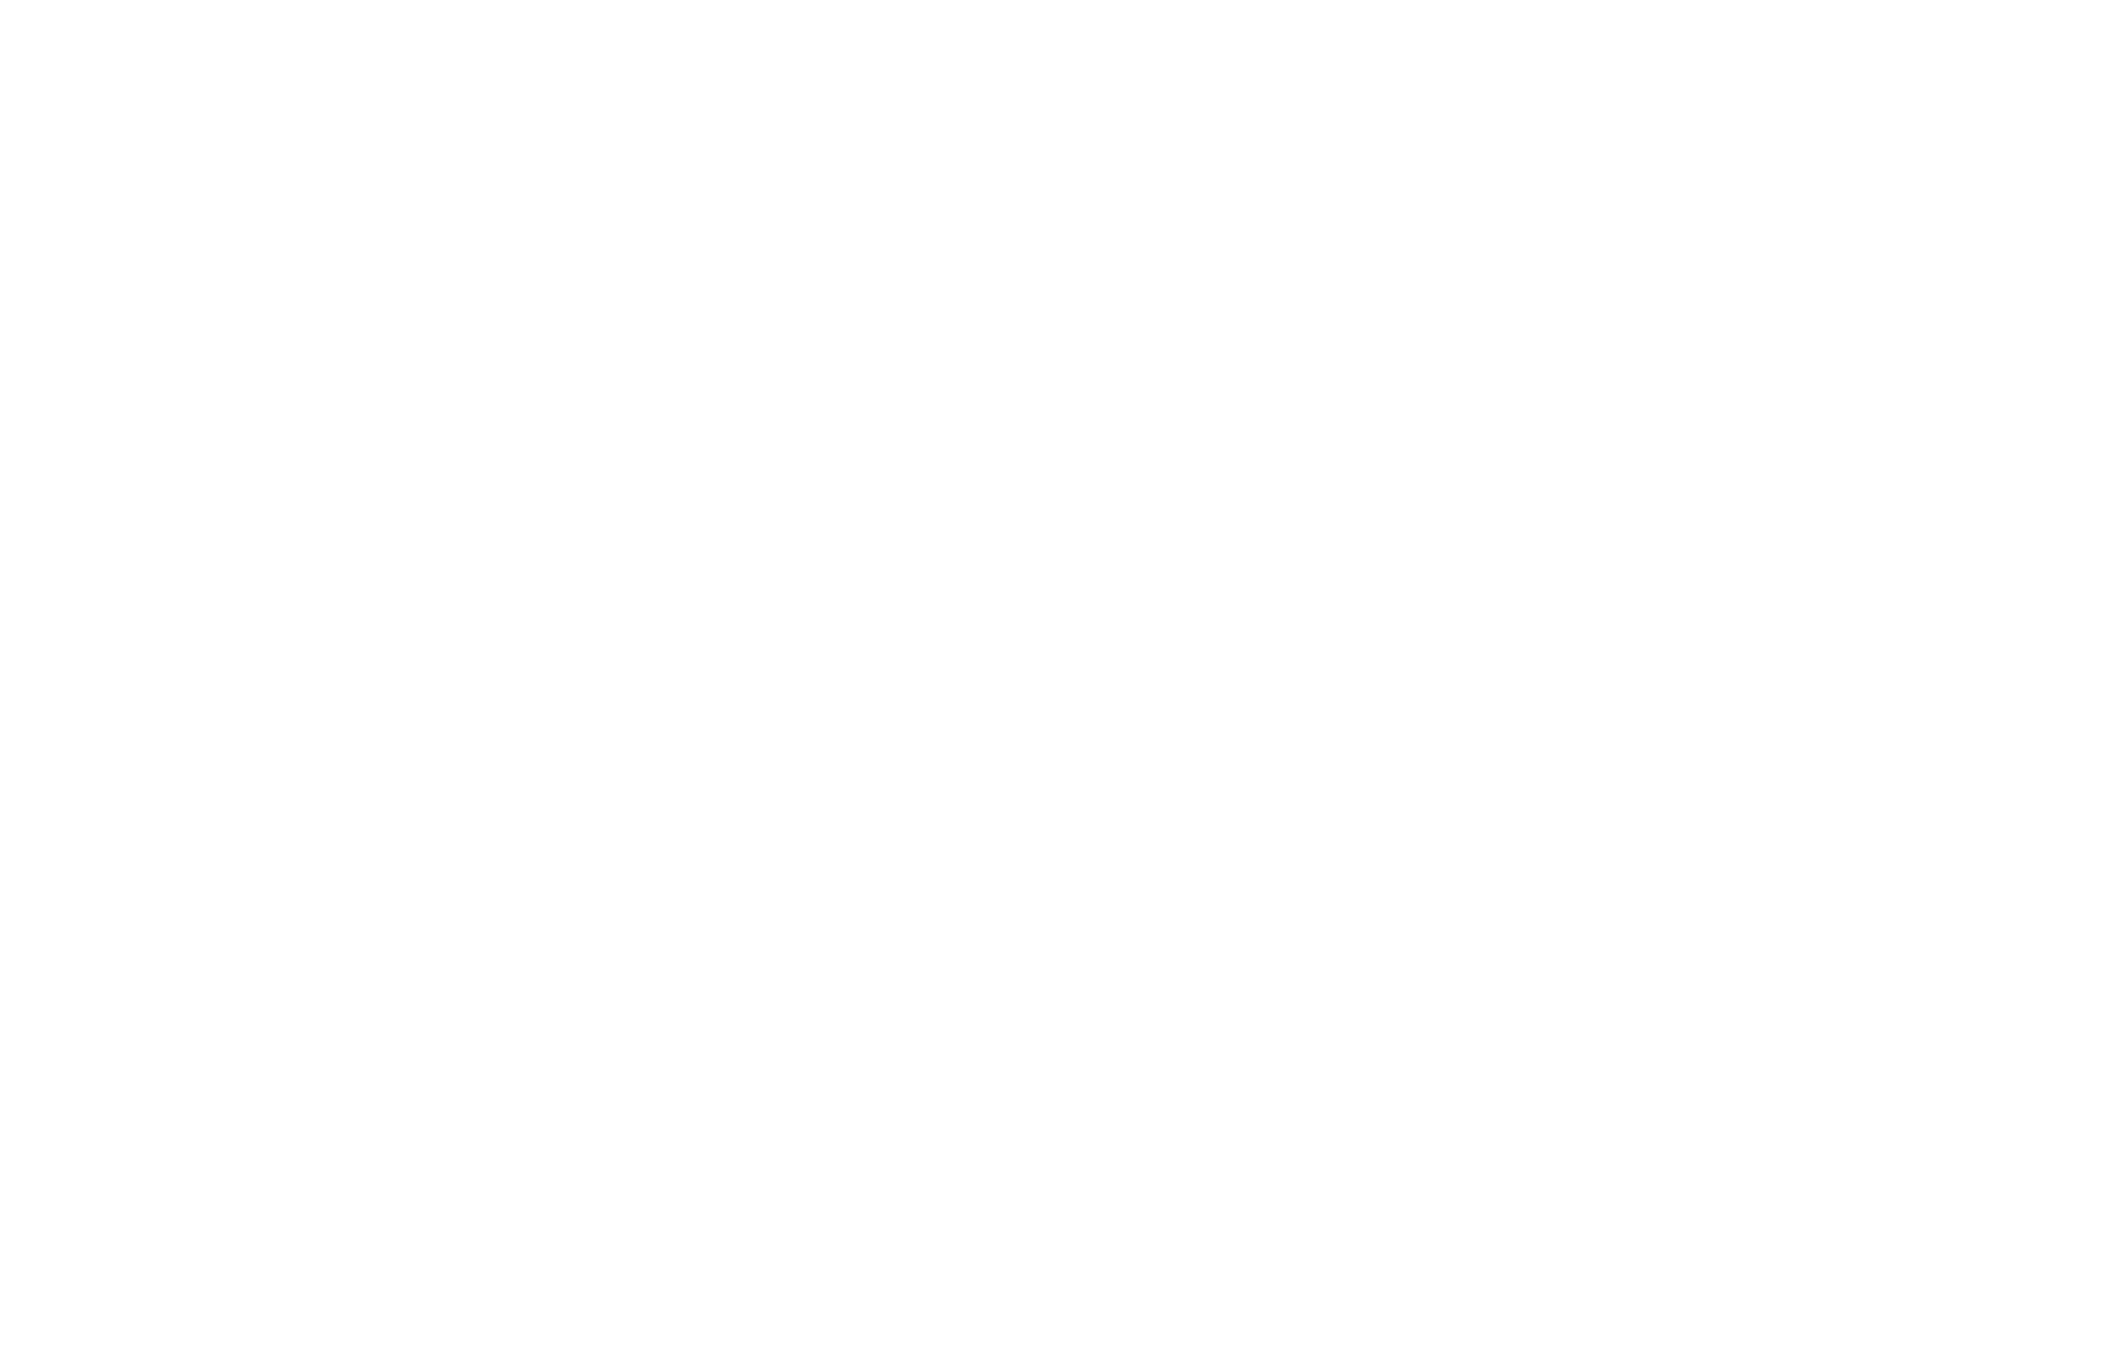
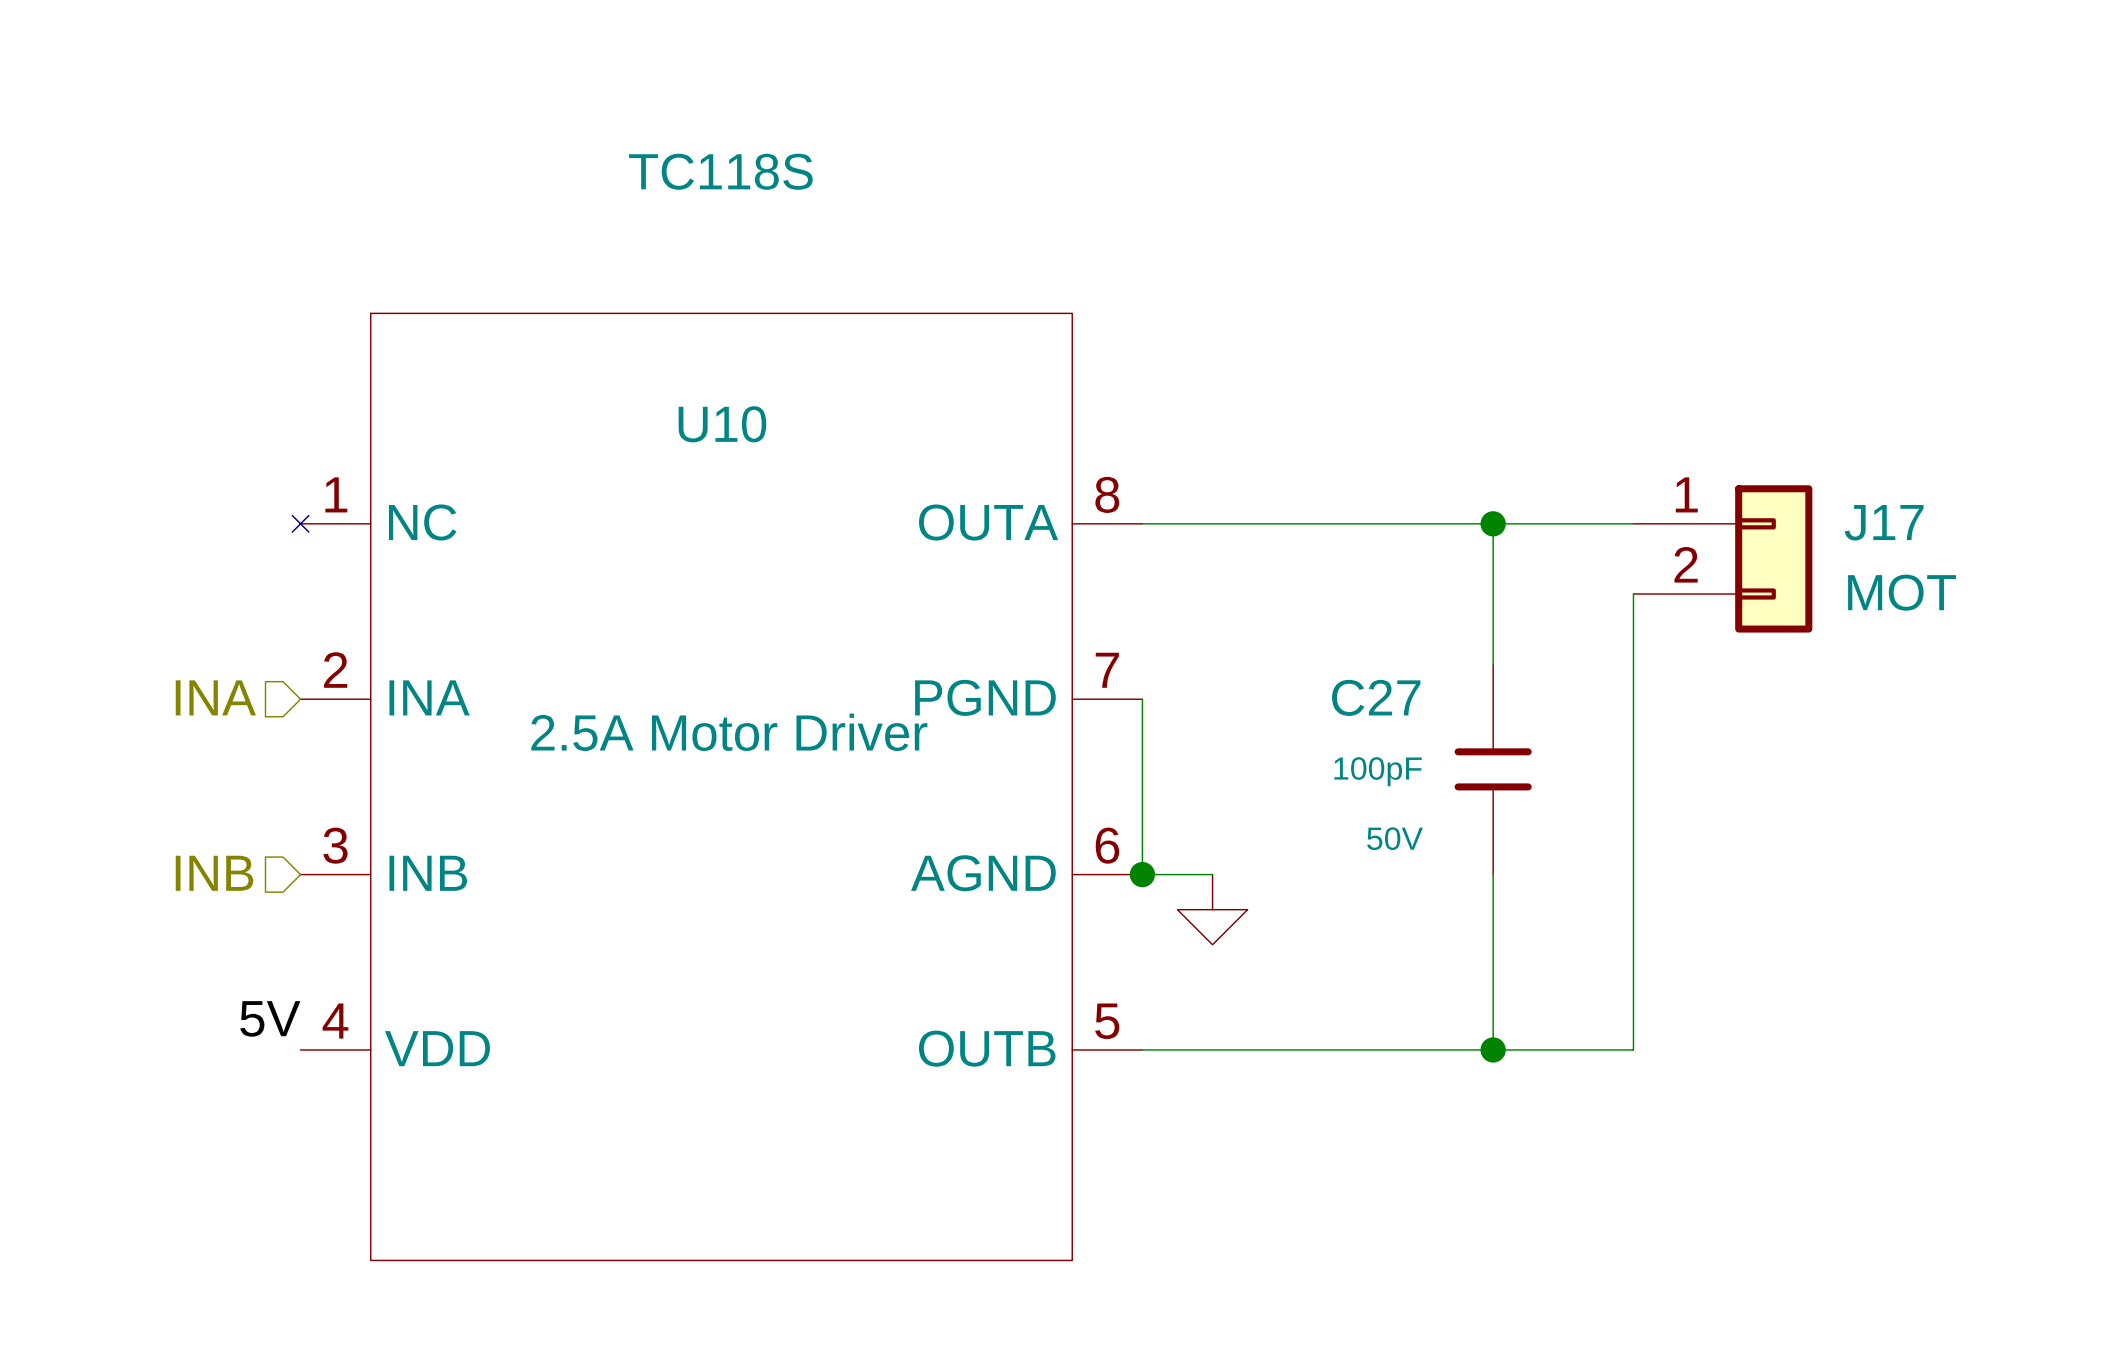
wire: none -> (1142, 523) (1633, 523)
wire: none -> (1493, 523) (1493, 664)
junction: none -> (1493, 523)
J17: none -> MOT (1722, 558)
wire: none -> (1633, 593) (1633, 1049) (1142, 1049)
hierarchical label: none -> INA (215, 697)
wire: none -> (1142, 699) (1142, 874) (1212, 874)
C27: none -> 100pF (1493, 769)
U10: none -> TC118S (717, 786)
hierarchical label: none -> INB (214, 873)
junction: none -> (1142, 874)
wire: none -> (1493, 874) (1493, 1049)
power symbol: none -> (1212, 909)
label: none -> 5V (270, 1018)
junction: none -> (1493, 1049)

